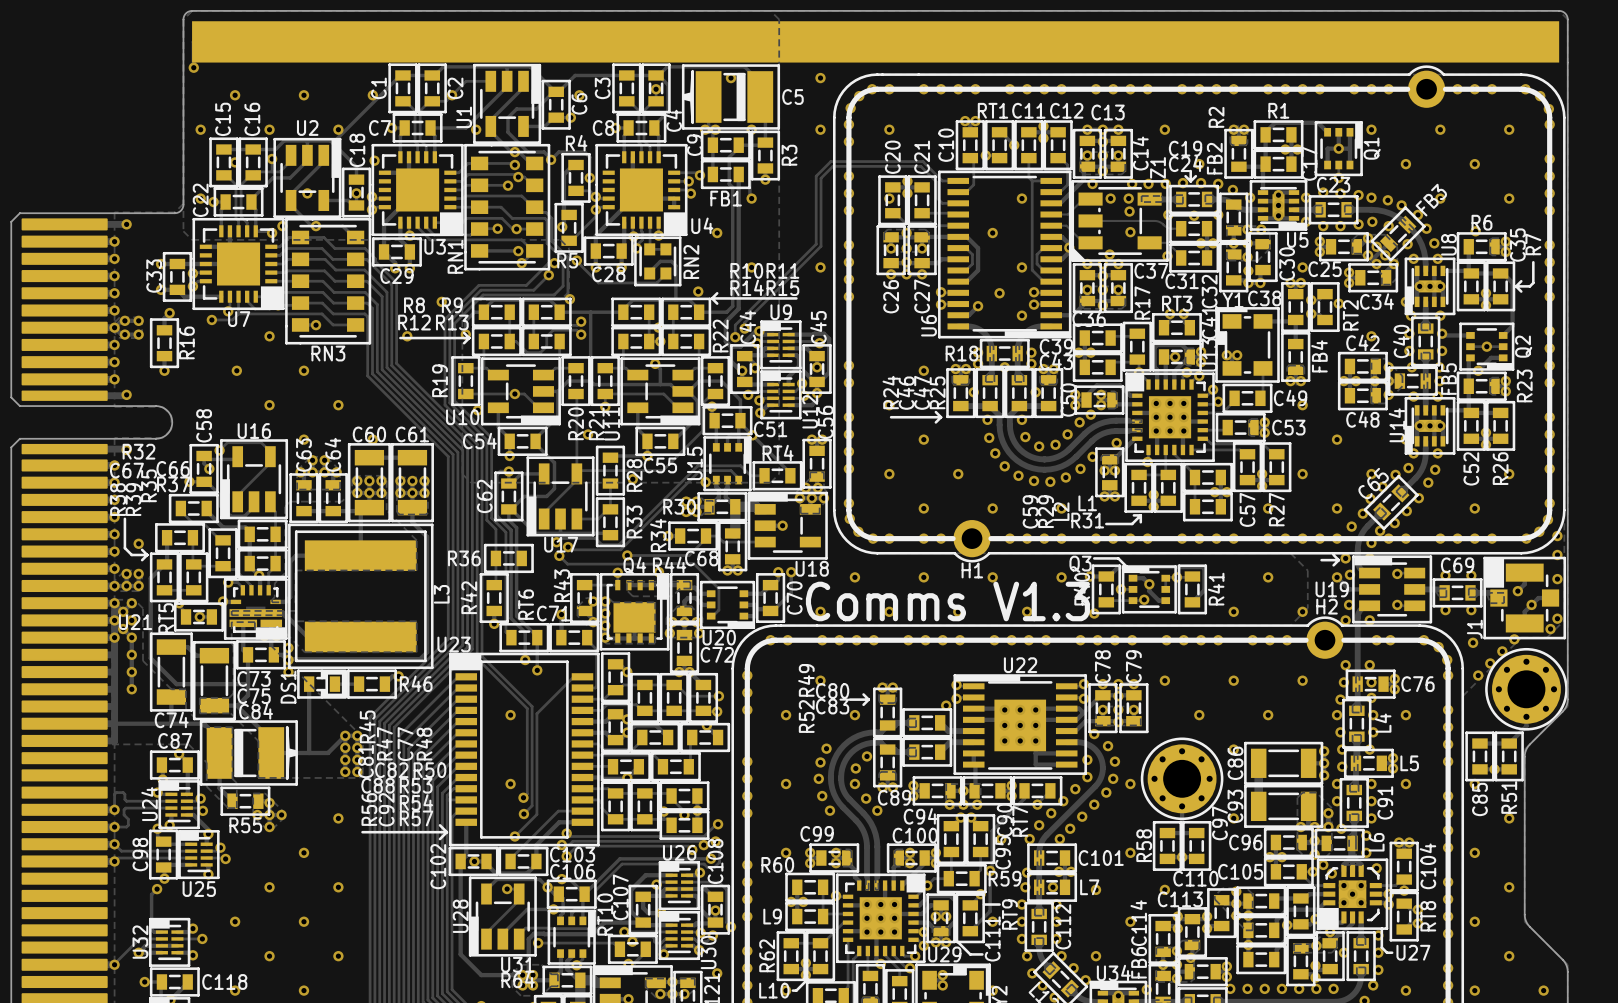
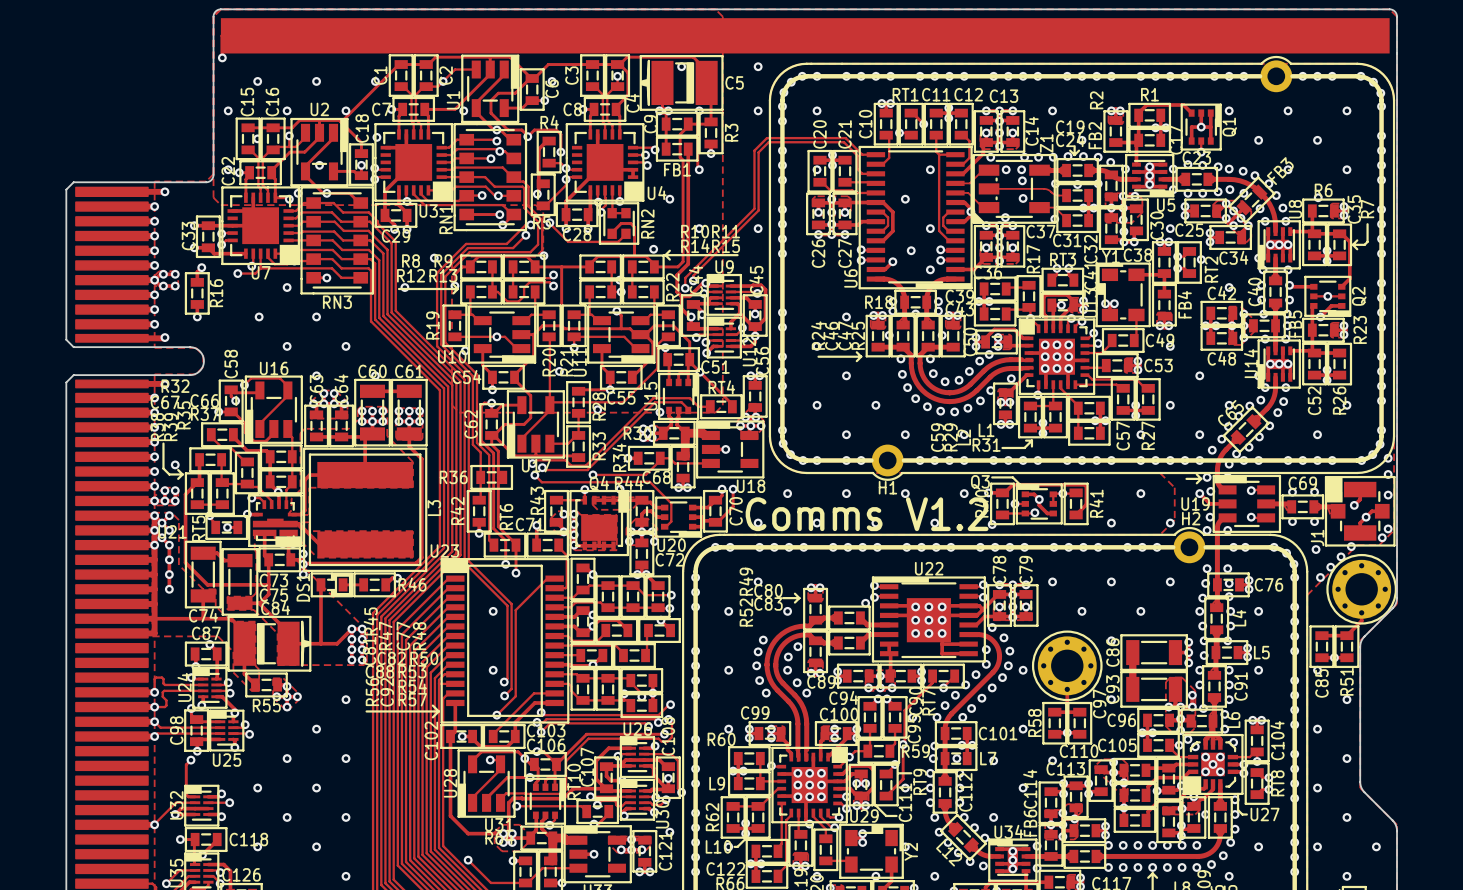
text: Comms V1.3 (947, 601) -> Comms V1.2 (867, 514)

